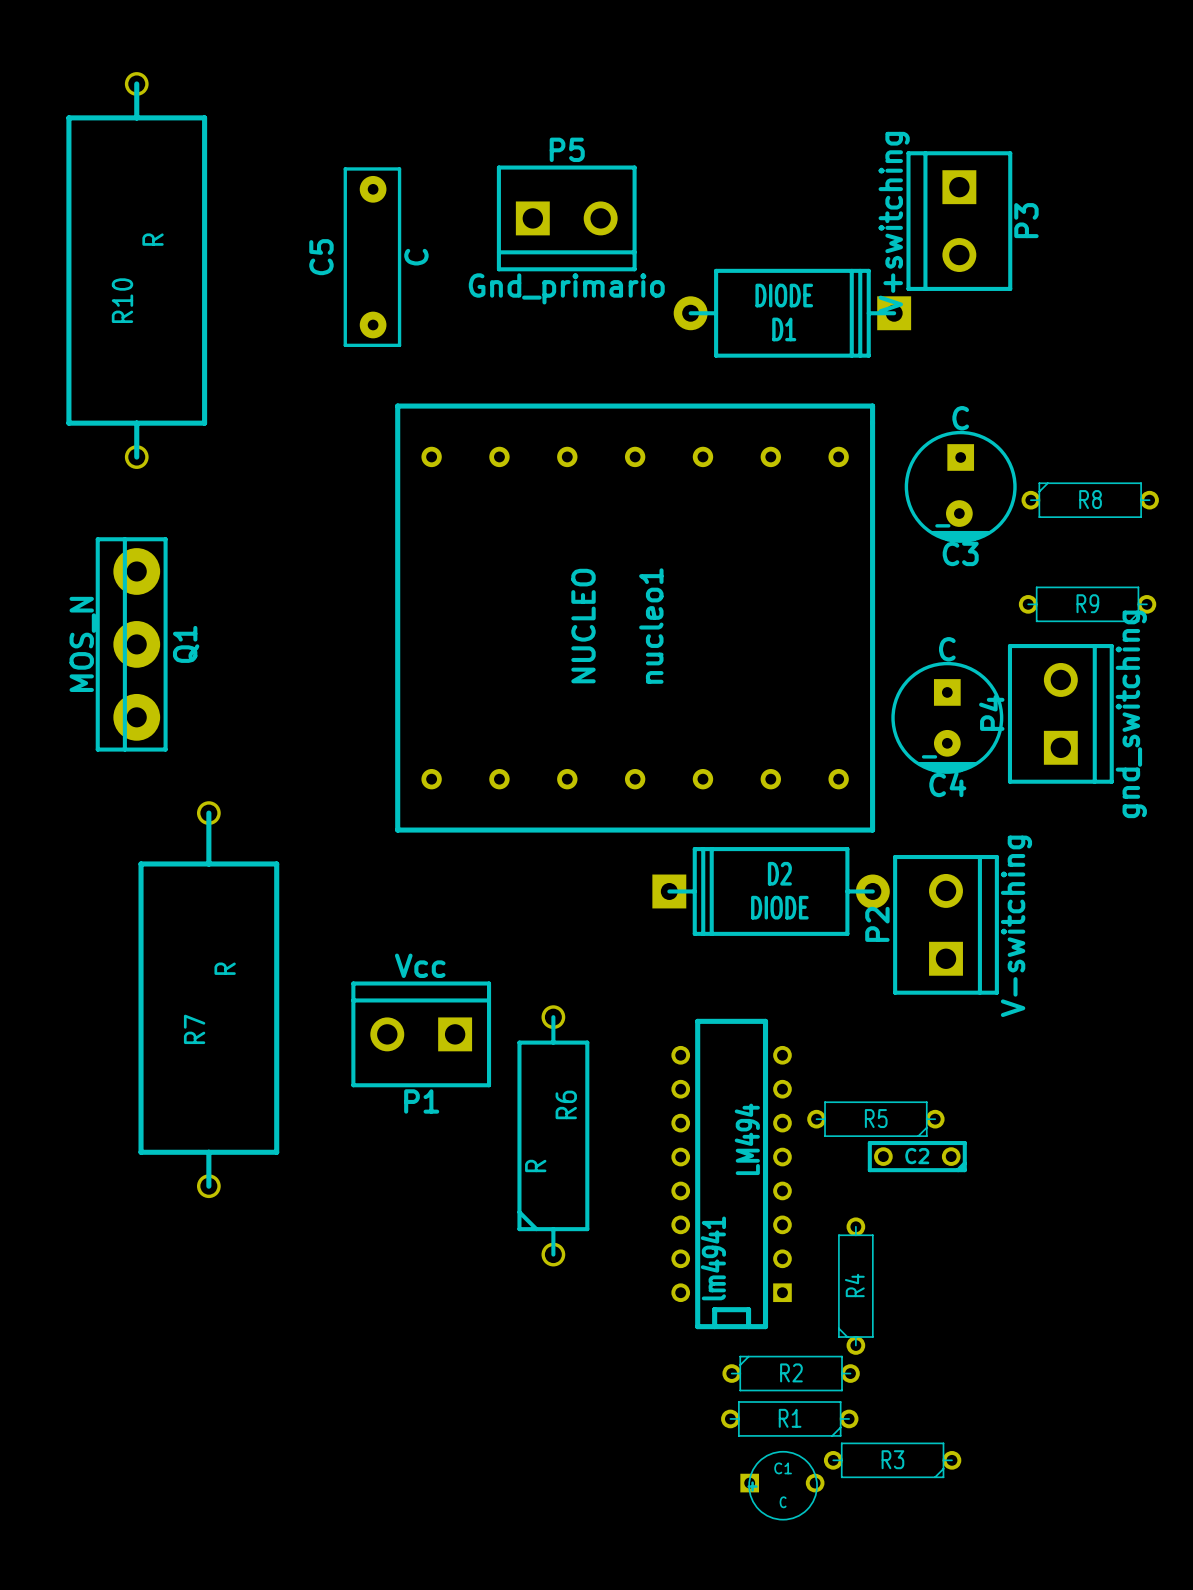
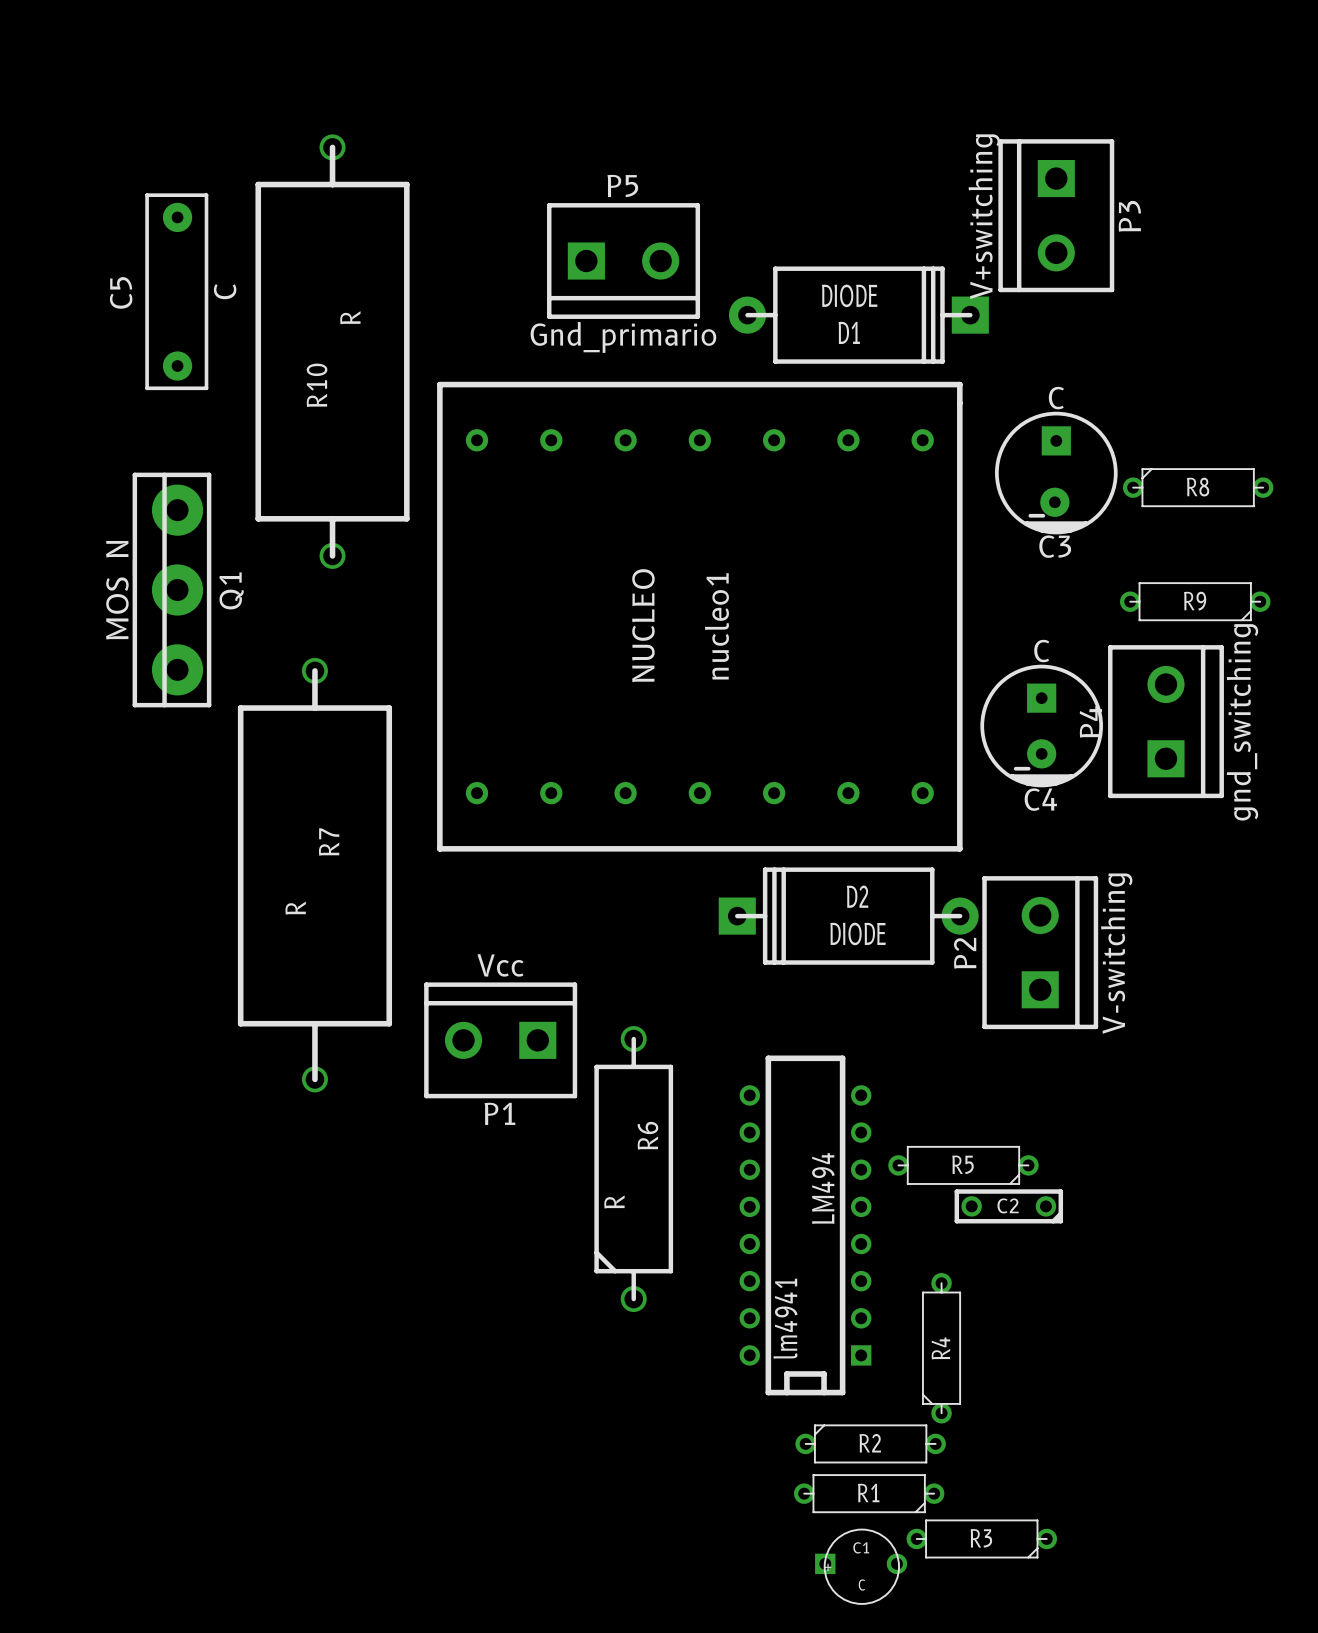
P5 position: (566, 218) -> (623, 261)
P3 position: (959, 221) -> (1056, 215)
C5 position: (372, 257) -> (176, 291)
R10 position: (136, 270) -> (332, 351)
D1 position: (792, 313) -> (858, 315)
Q1 position: (131, 644) -> (171, 590)
R7 rotation: 0° (208, 999) -> 180° (314, 875)
P1 position: (421, 1034) -> (500, 1040)
R6 position: (553, 1135) -> (633, 1169)

